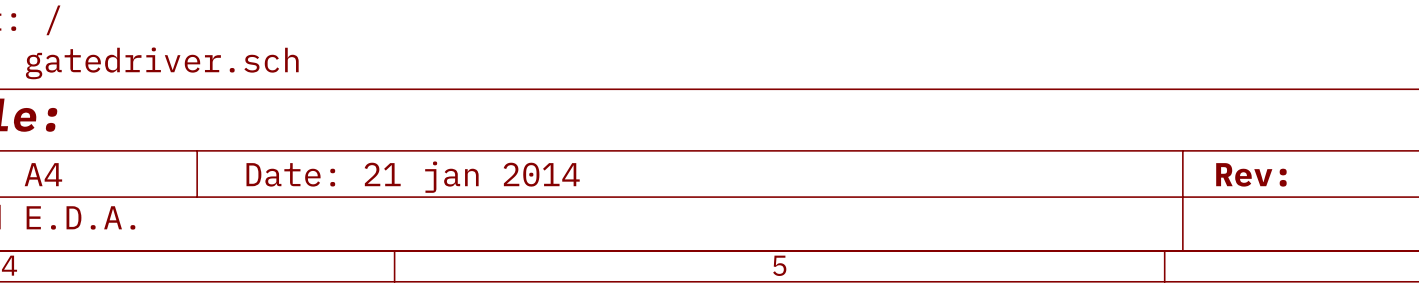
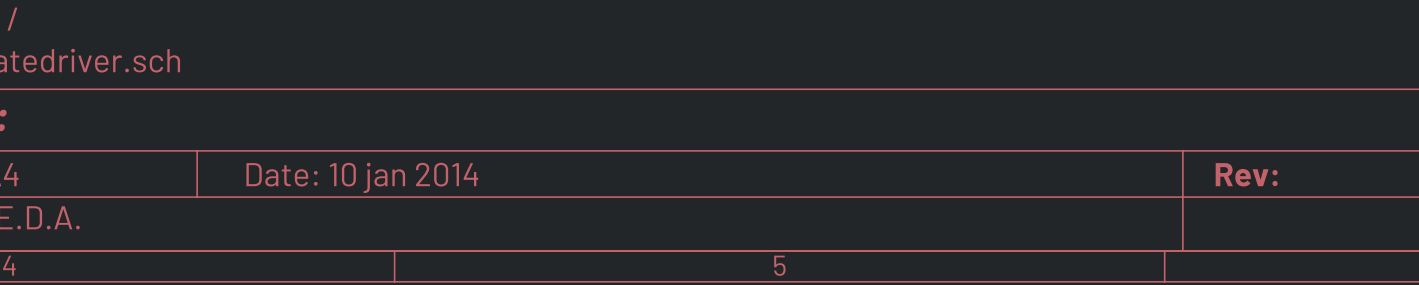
title block: Date: 21 jan 2014 (413, 177) -> Date: 10 jan 2014 (362, 177)

